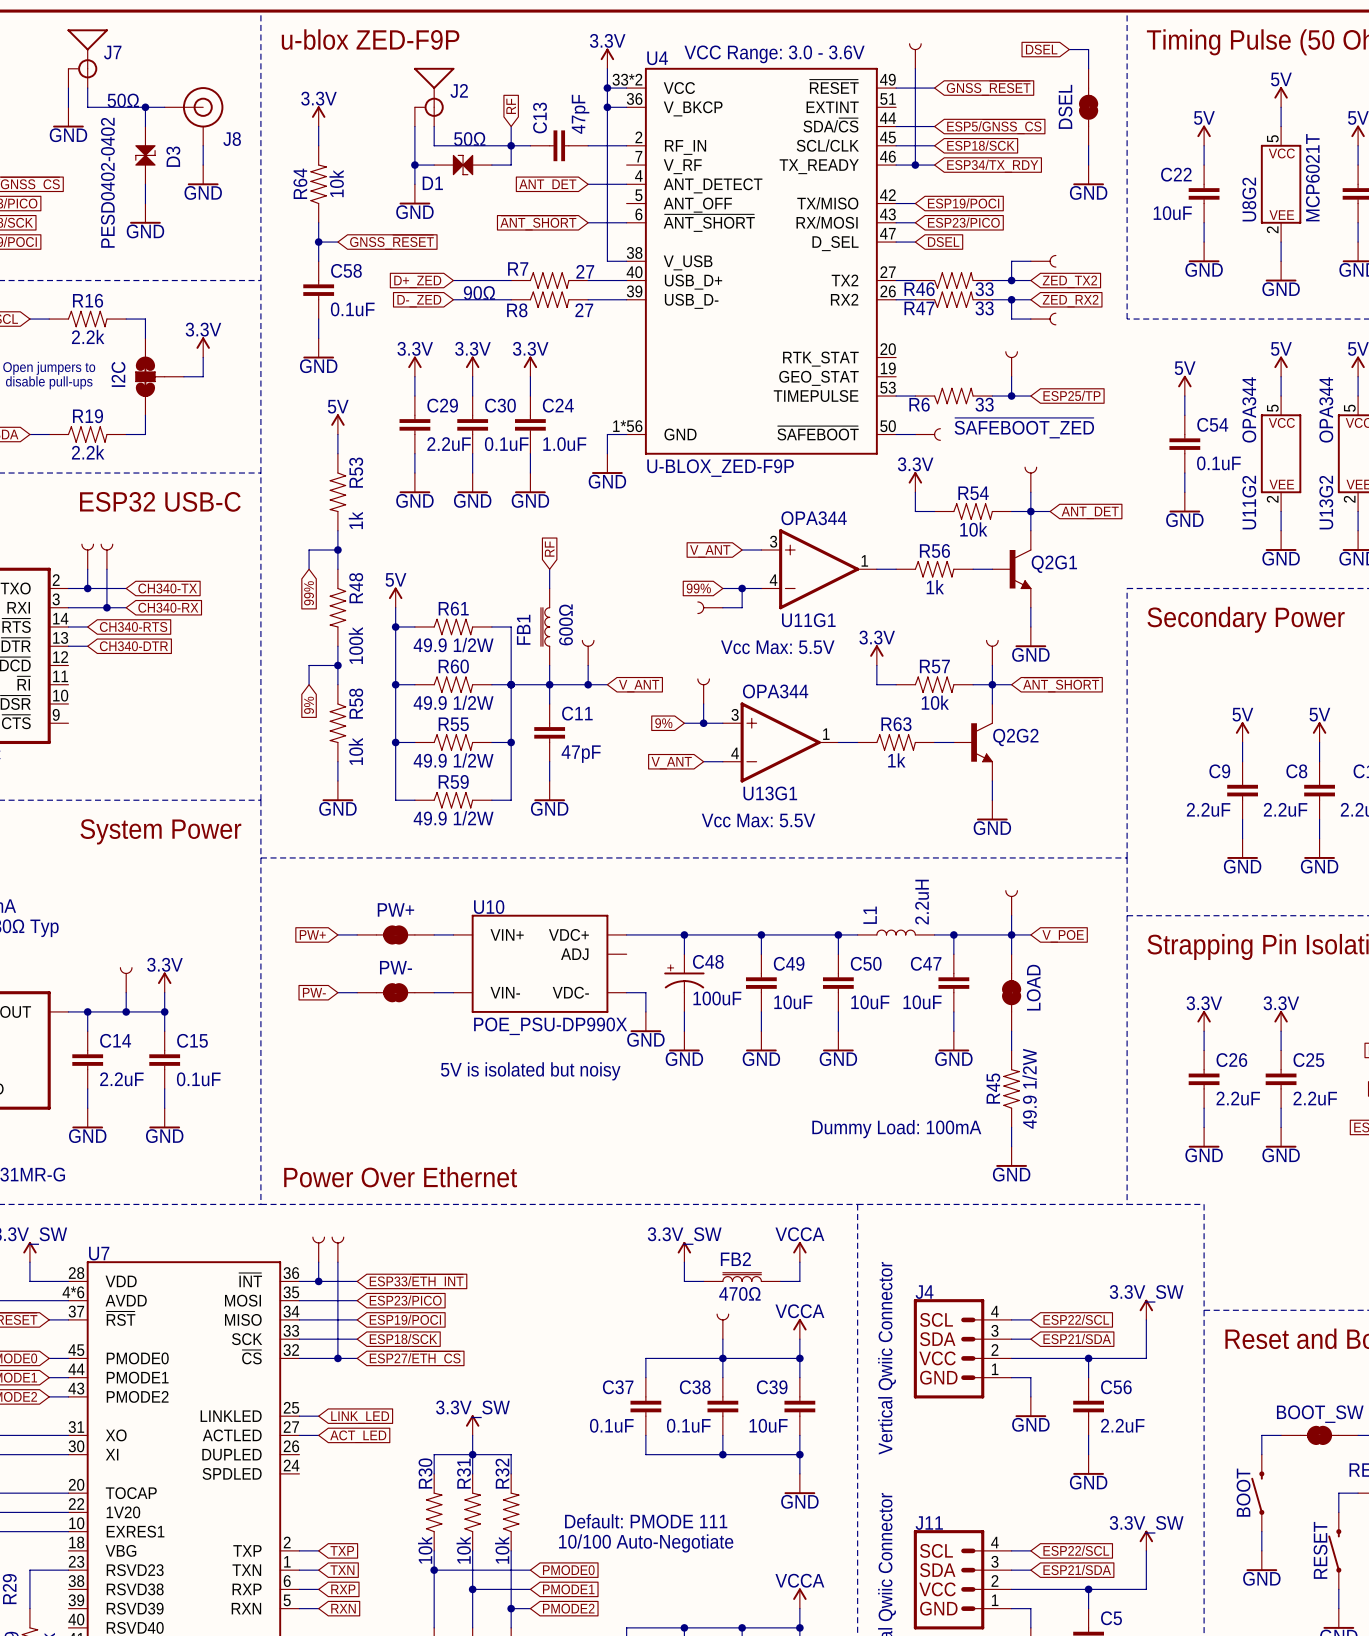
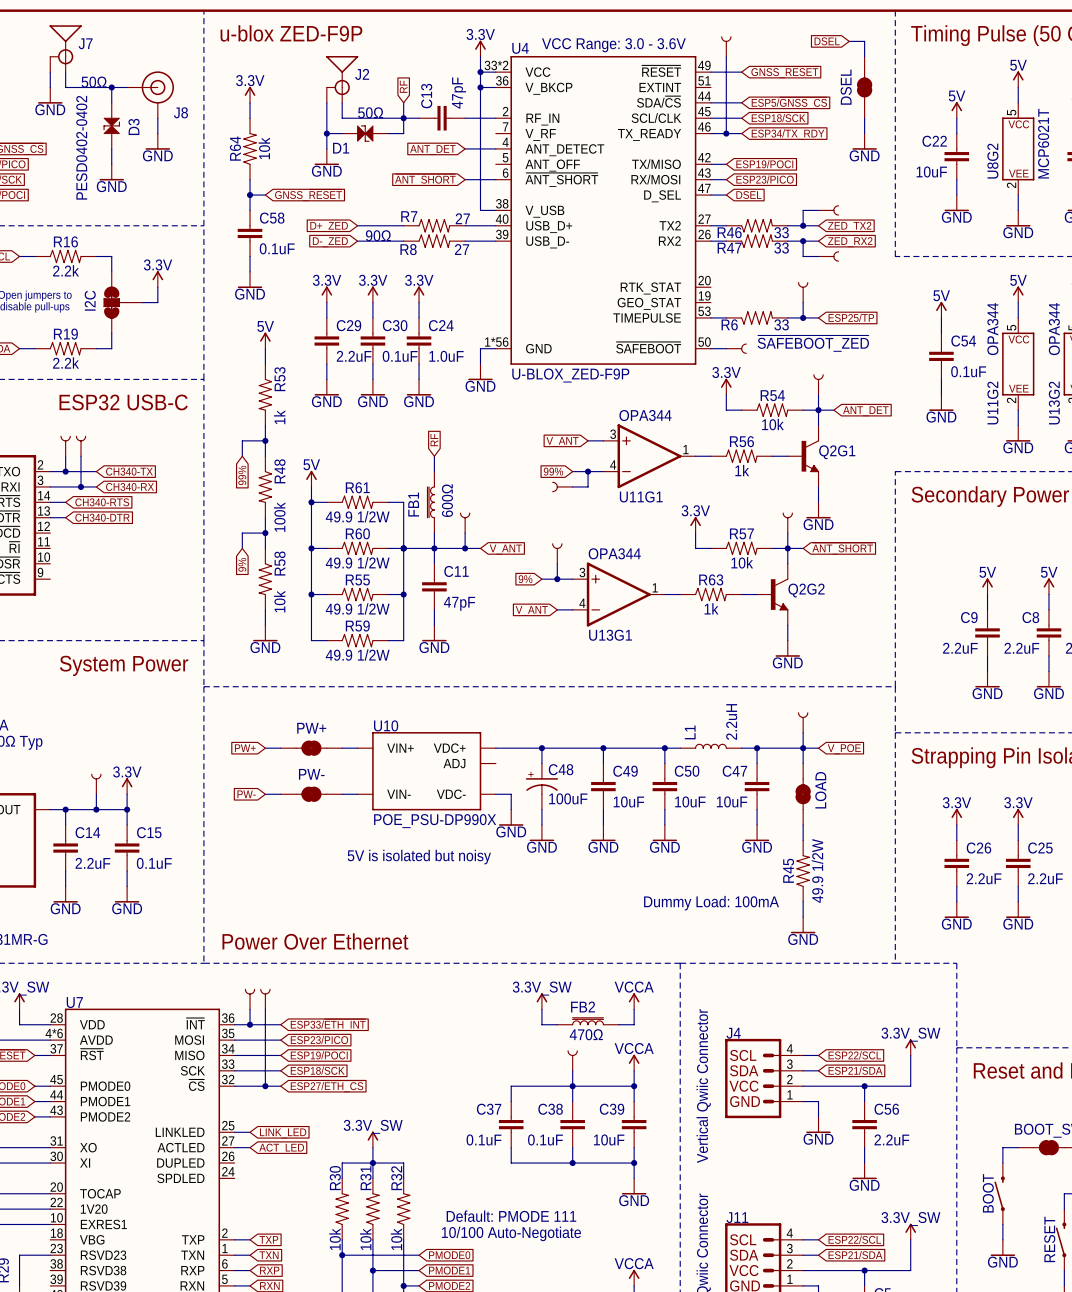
text: Vcc Max: 5.5V (777, 647) -> none
text: Vcc Max: 5.5V (758, 820) -> none

